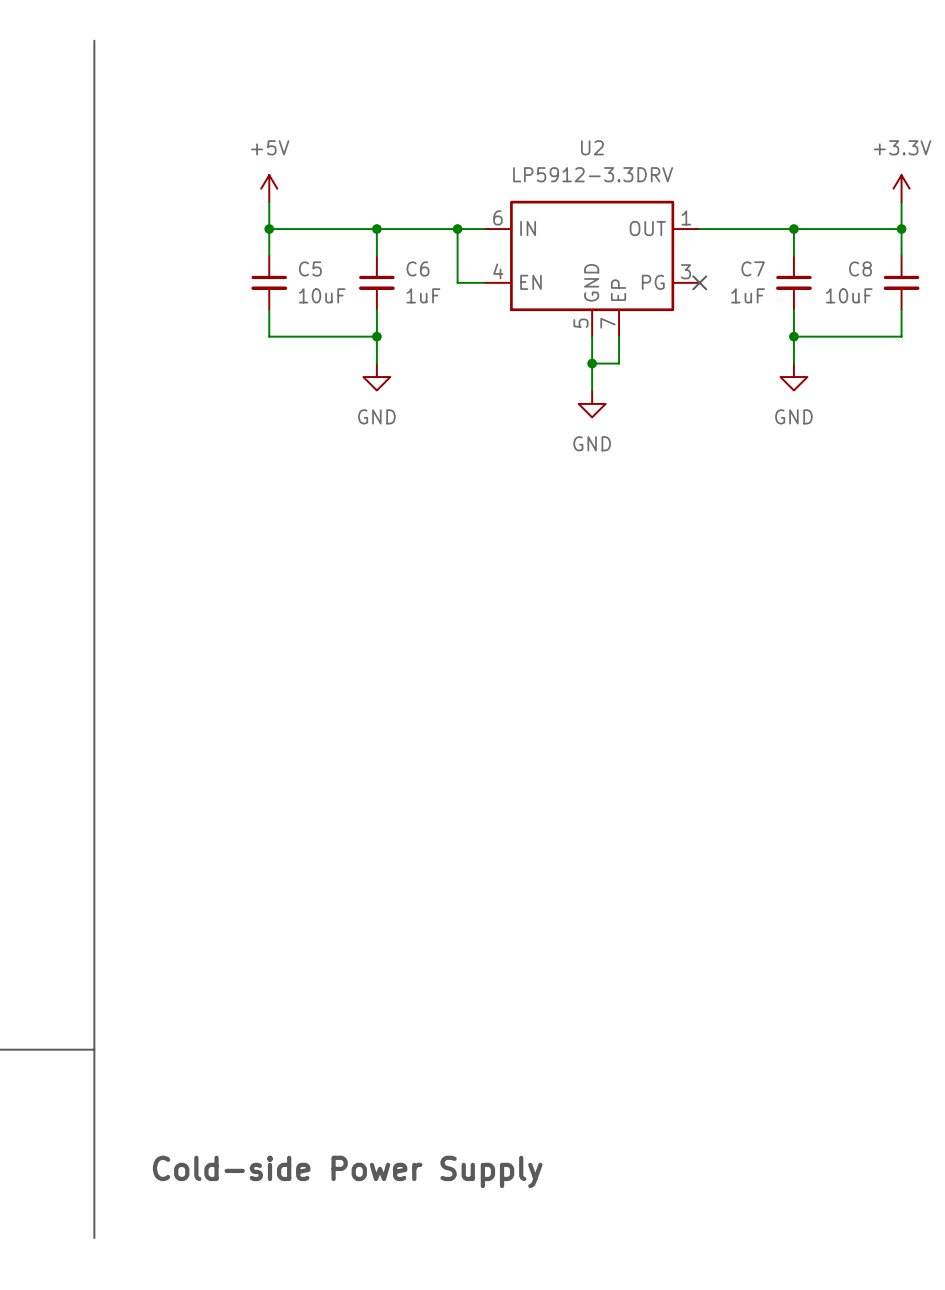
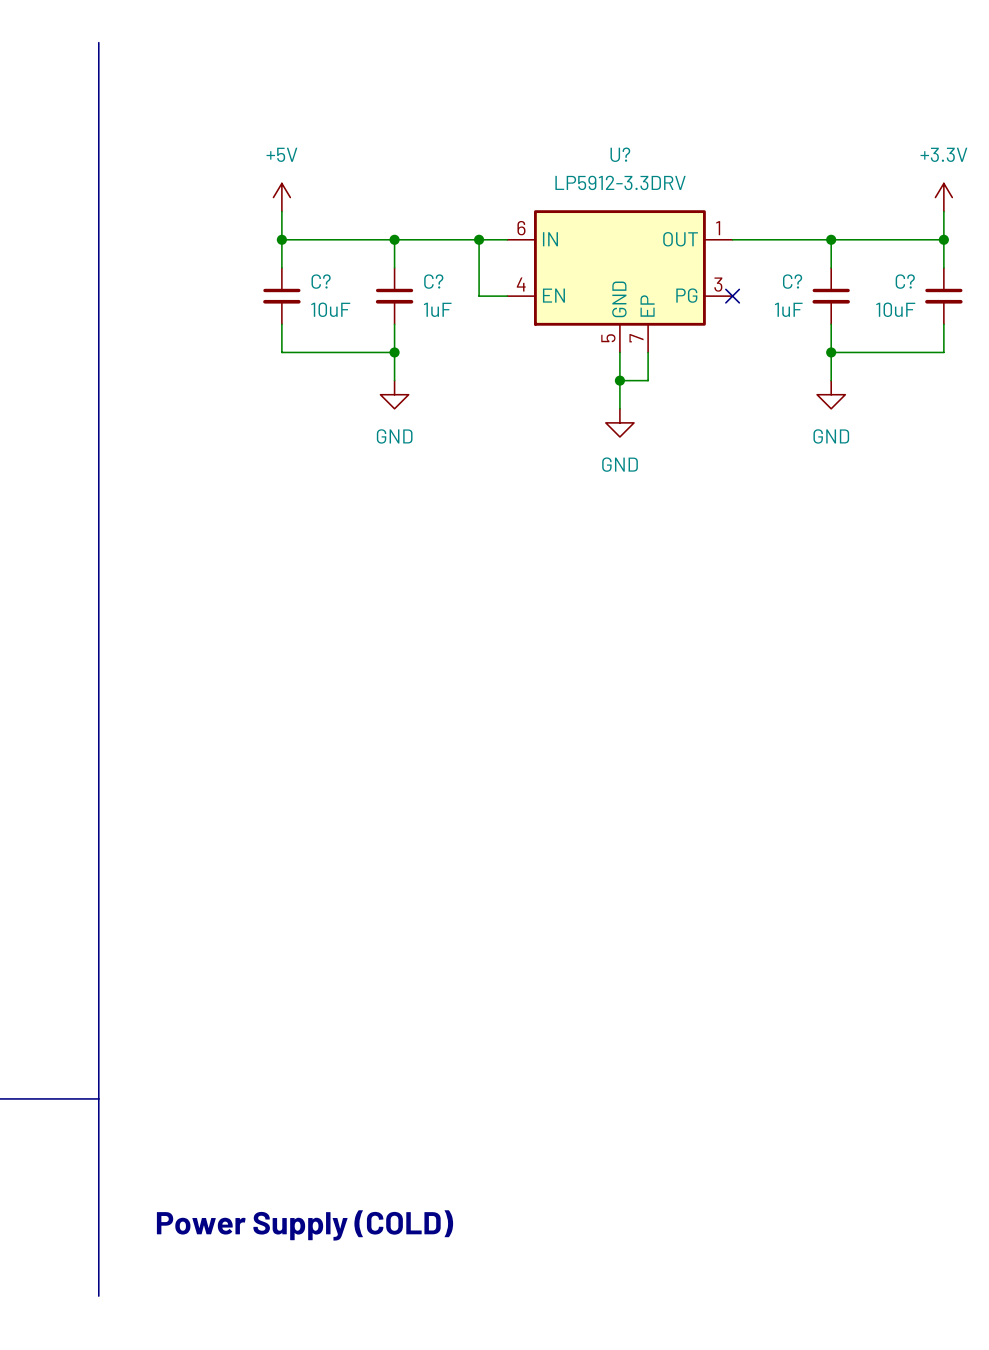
U2 name: U2 (592, 147) -> U? (620, 154)
C5 name: C5 (310, 268) -> C? (321, 281)
C6 name: C6 (417, 268) -> C? (433, 281)
C7 name: C7 (753, 268) -> C? (792, 281)
C8 name: C8 (860, 268) -> C? (905, 281)
text: Cold-side Power Supply (347, 1171) -> Power Supply (COLD) (305, 1225)

